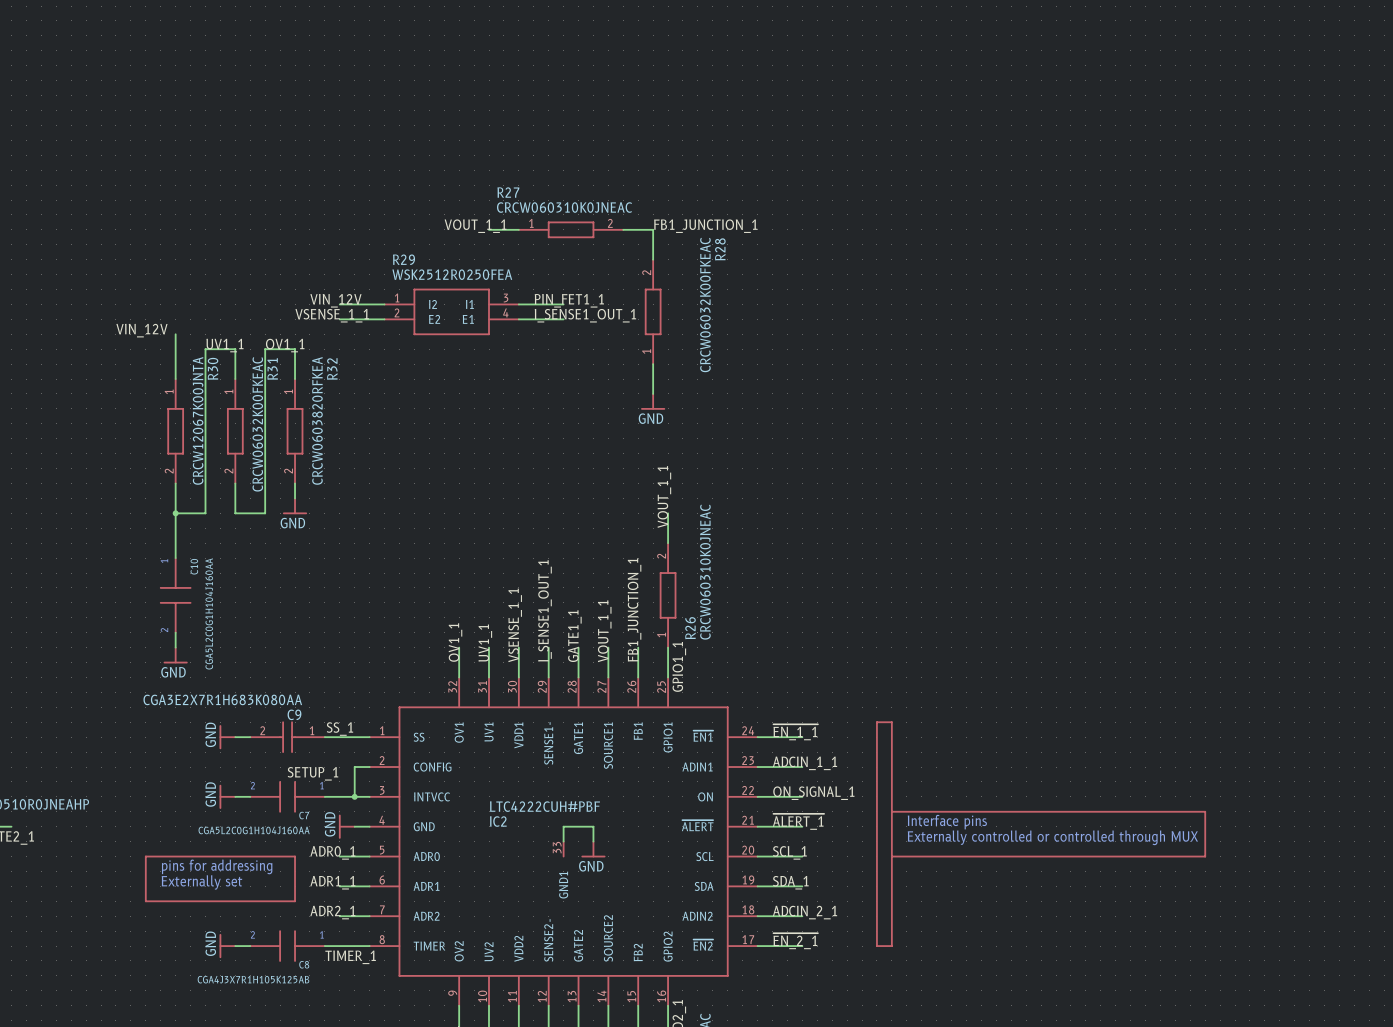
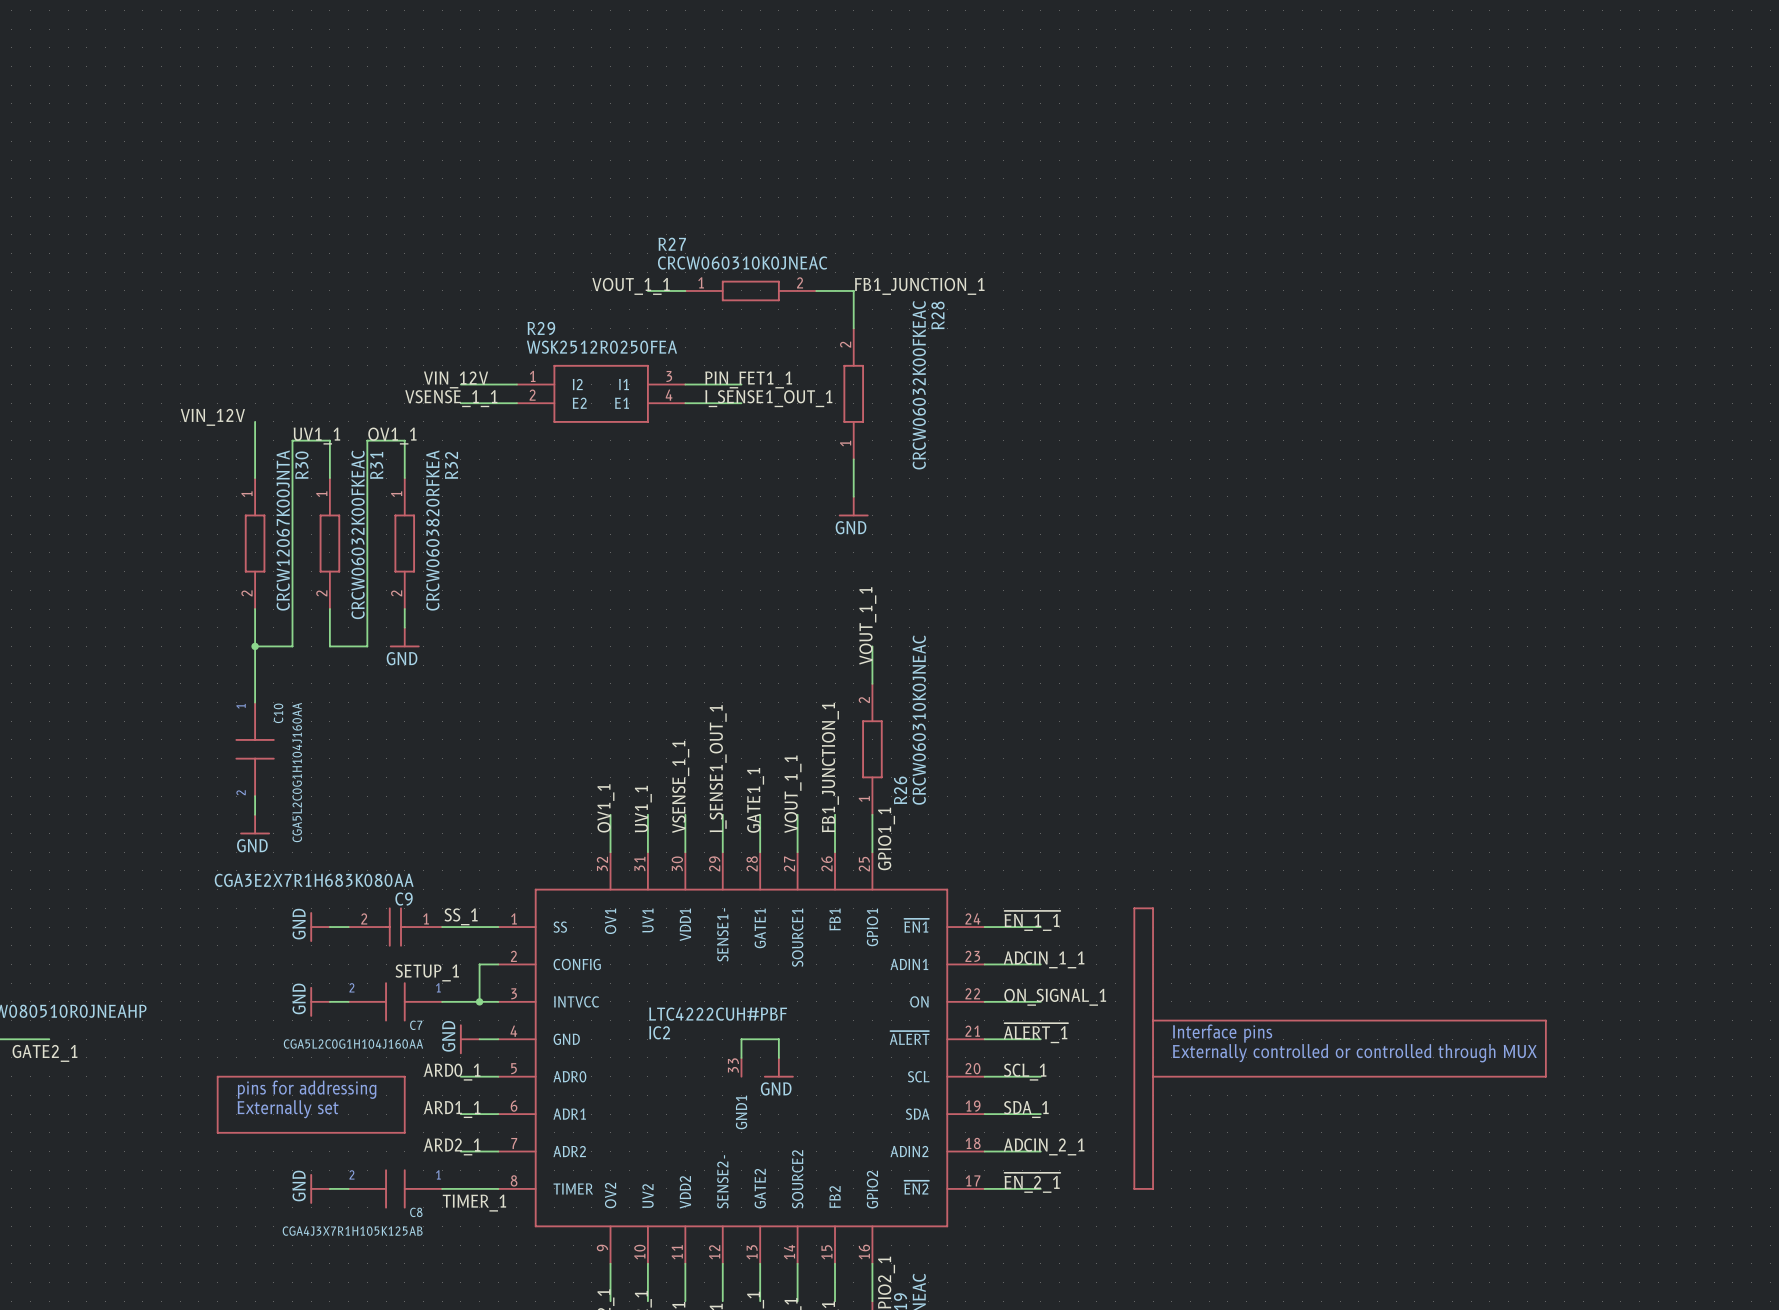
label: ADR0_1 (332, 852) -> ARD0_1 (452, 1072)
label: ADR1_1 (332, 882) -> ARD1_1 (452, 1109)
label: ADR2_1 (332, 912) -> ARD2_1 (452, 1146)

